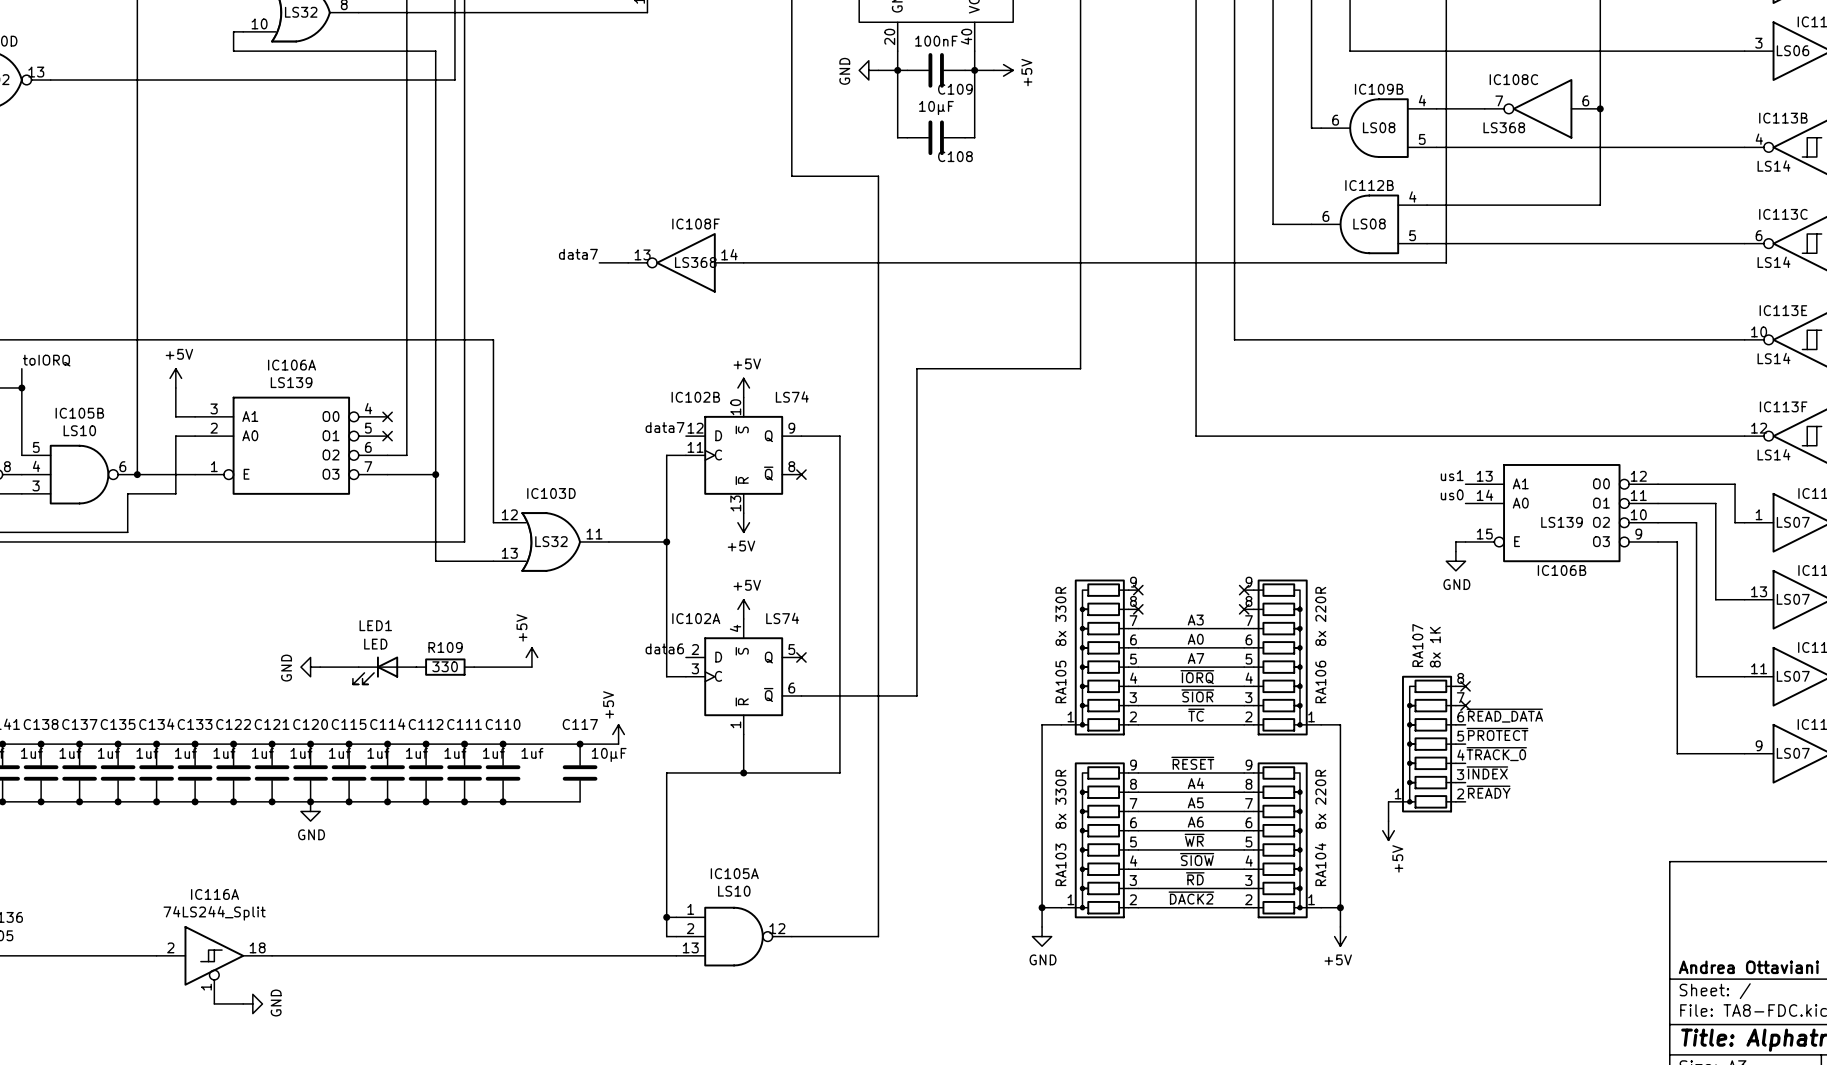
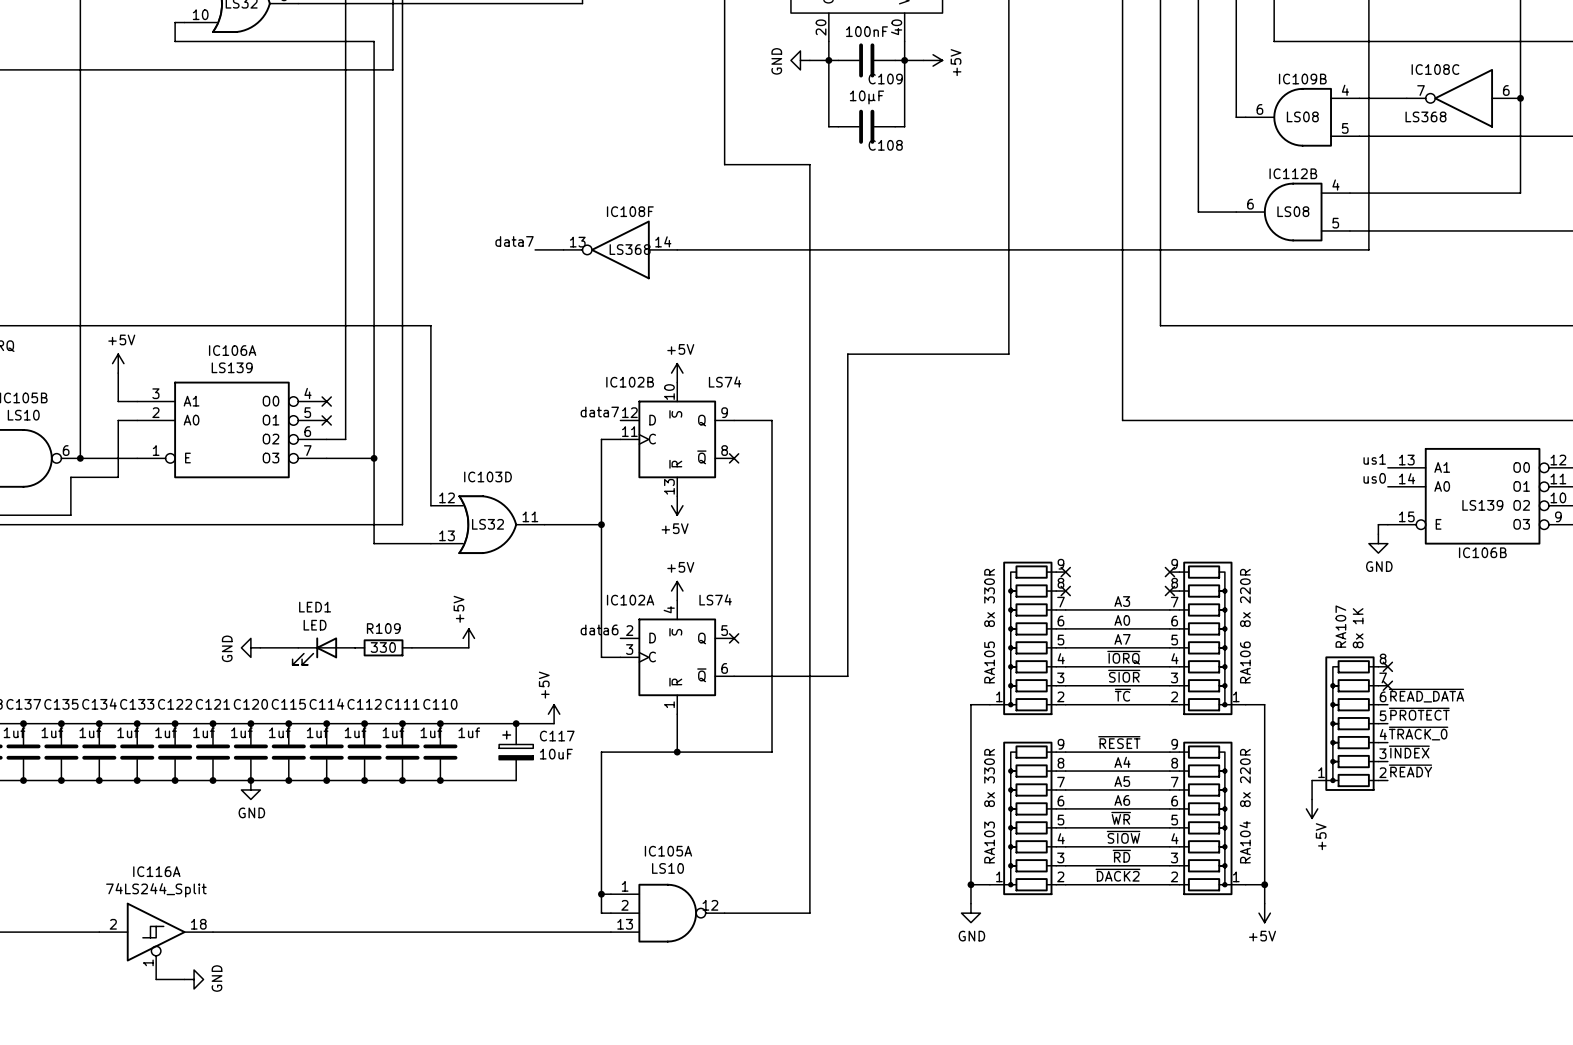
C117 name position: C117 (580, 724) -> C117 (557, 736)
C117 symbol: [562, 744, 598, 802] -> [499, 723, 534, 781]
C117 value: 10µF (609, 754) -> 10uF (556, 754)

